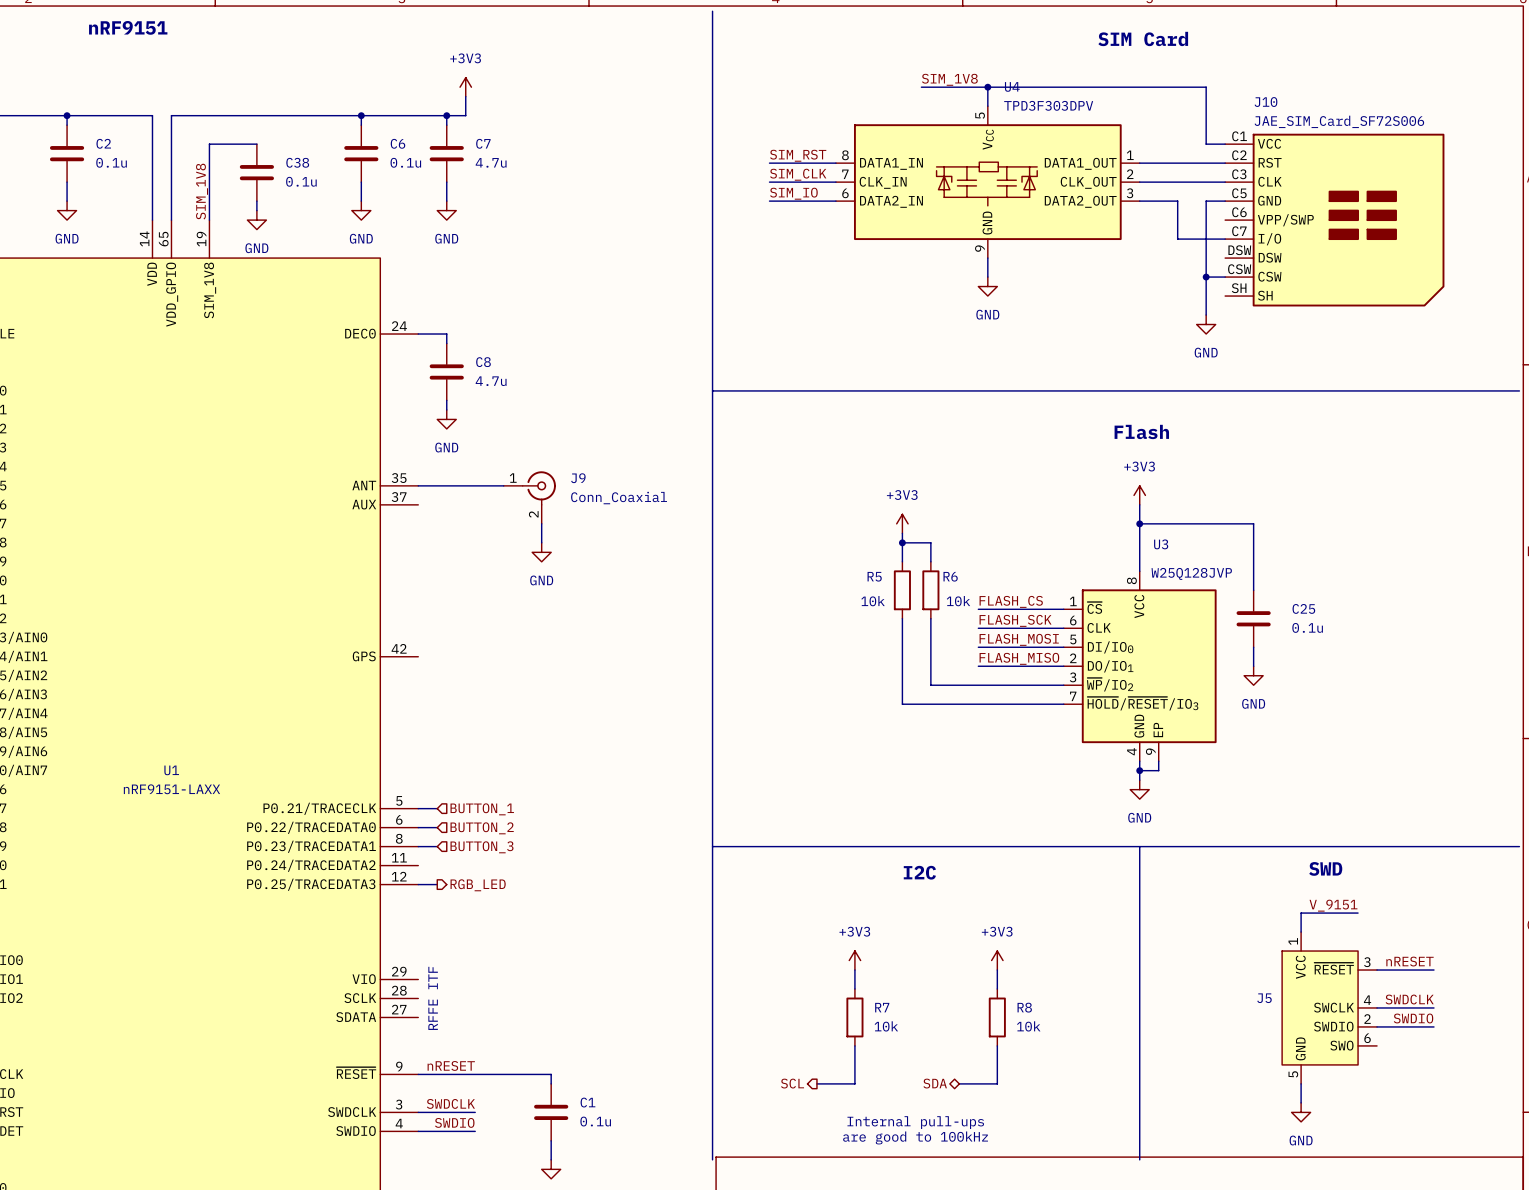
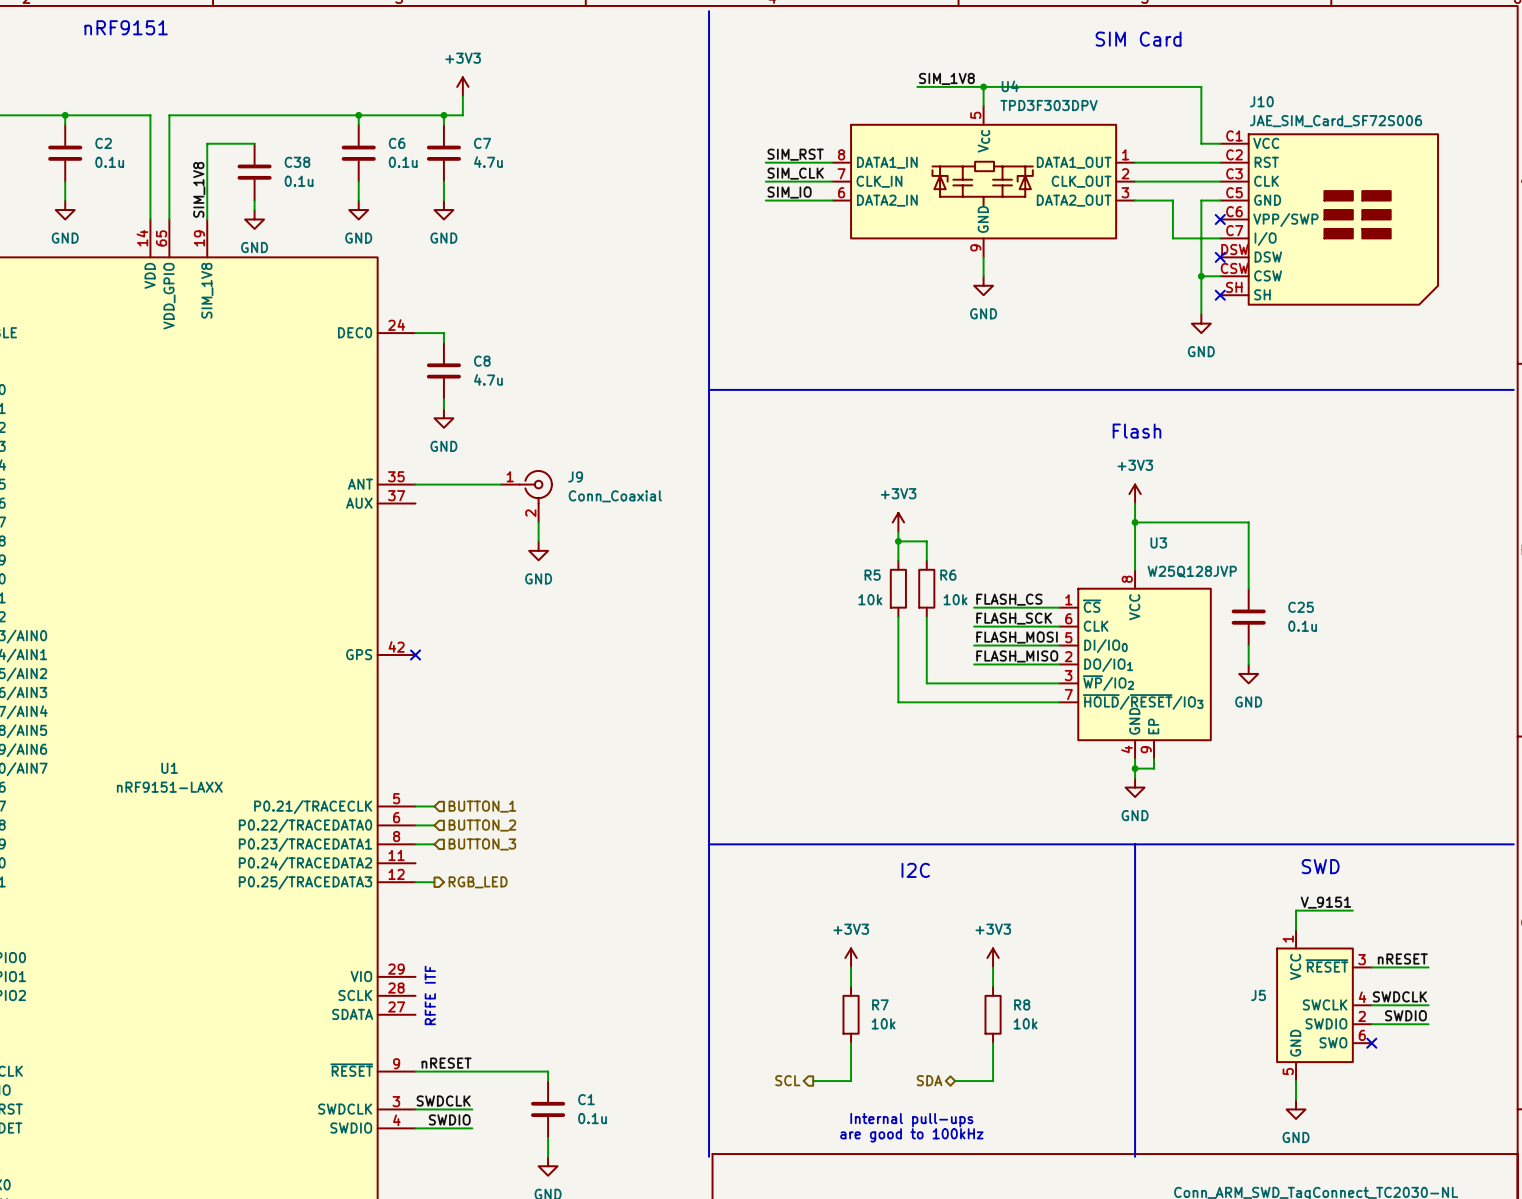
no-connect mark: none -> (1220, 219)
no-connect mark: none -> (1220, 257)
no-connect mark: none -> (1220, 295)
no-connect mark: none -> (415, 654)
no-connect mark: none -> (1371, 1043)

